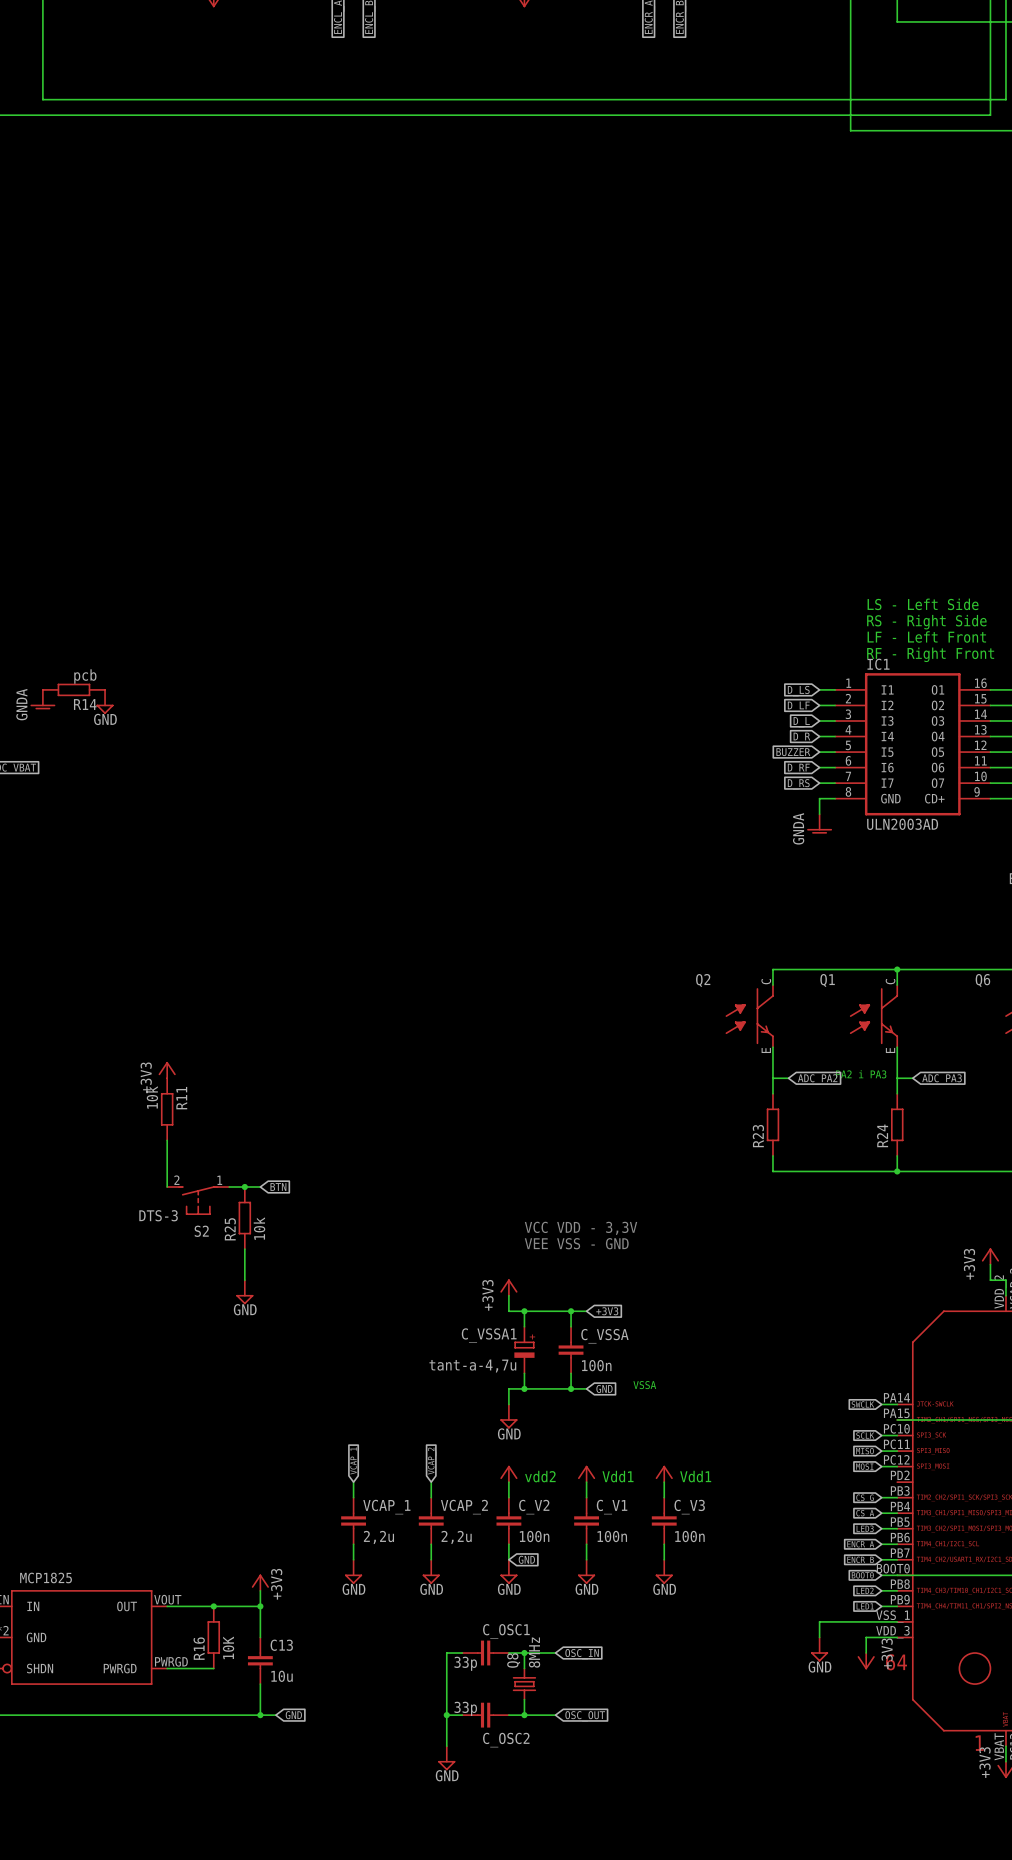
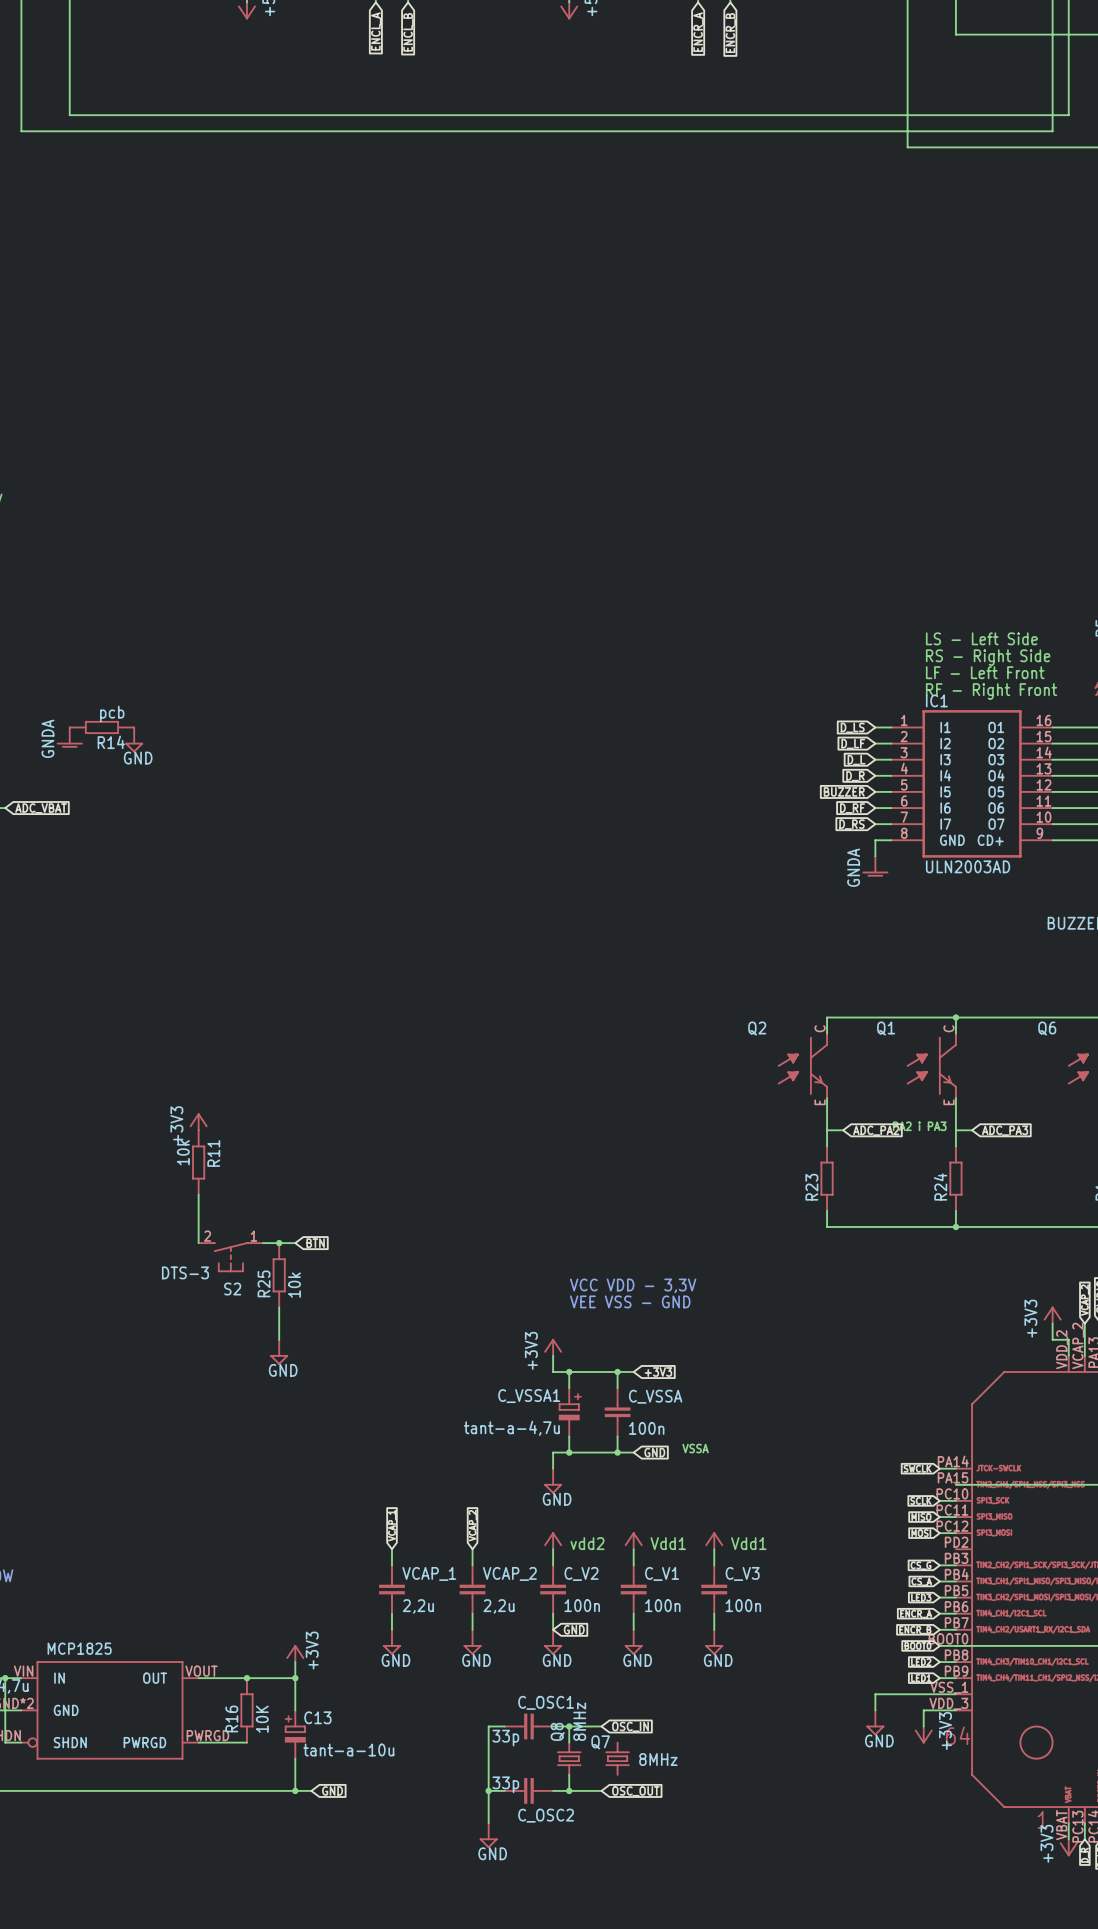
C13 symbol: [247, 1637, 273, 1685] -> [284, 1710, 306, 1759]
C13 value: 10u (282, 1676) -> tant-a-10u (348, 1750)
Q7: none -> 8MHz (617, 1758)

